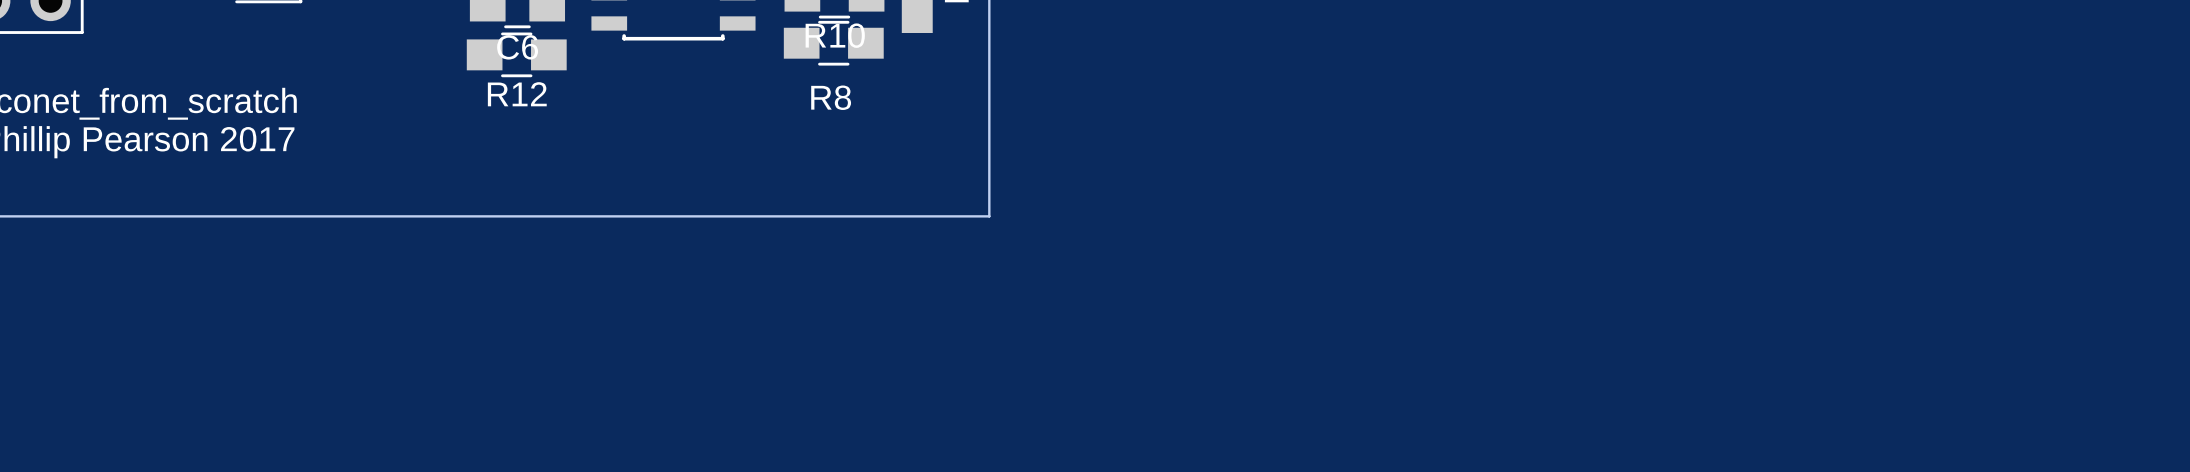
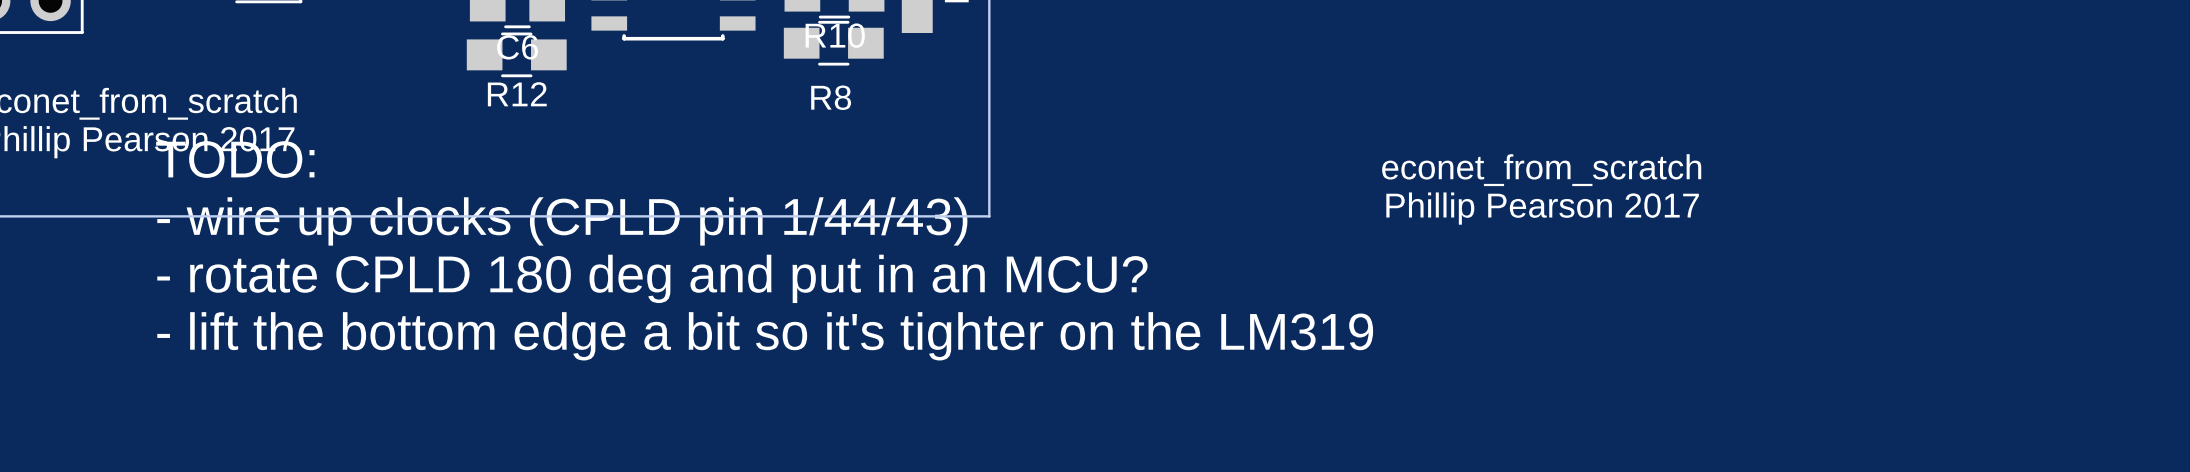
text: none -> TODO: (235, 159)
text: none -> econet_from_scratch (1541, 170)
text: none -> Phillip Pearson 2017 (1542, 208)
text: none -> - wire up clocks (CPLD pin 1/44/43) (562, 221)
text: none -> - rotate CPLD 180 deg and put in an MCU? (652, 278)
text: none -> - lift the bottom edge a bit so it's tighter on the LM319 (765, 336)

